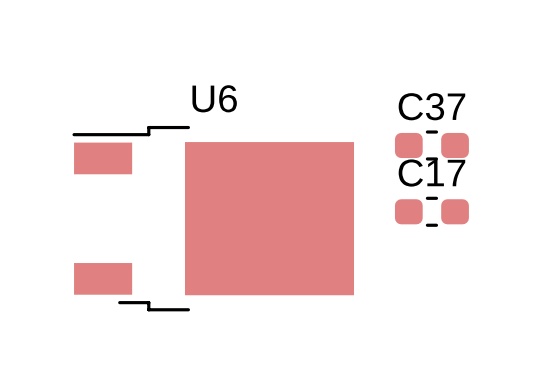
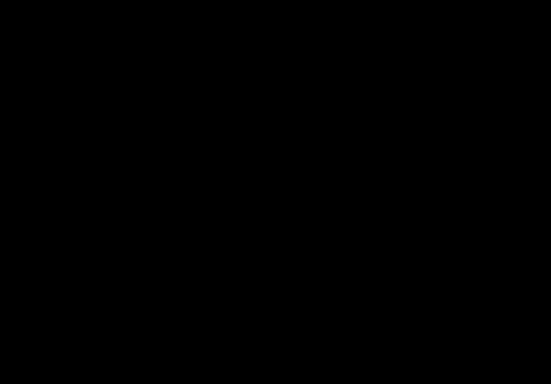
C37: (431, 145) -> none
C17: (431, 211) -> none
U6: (213, 218) -> none

